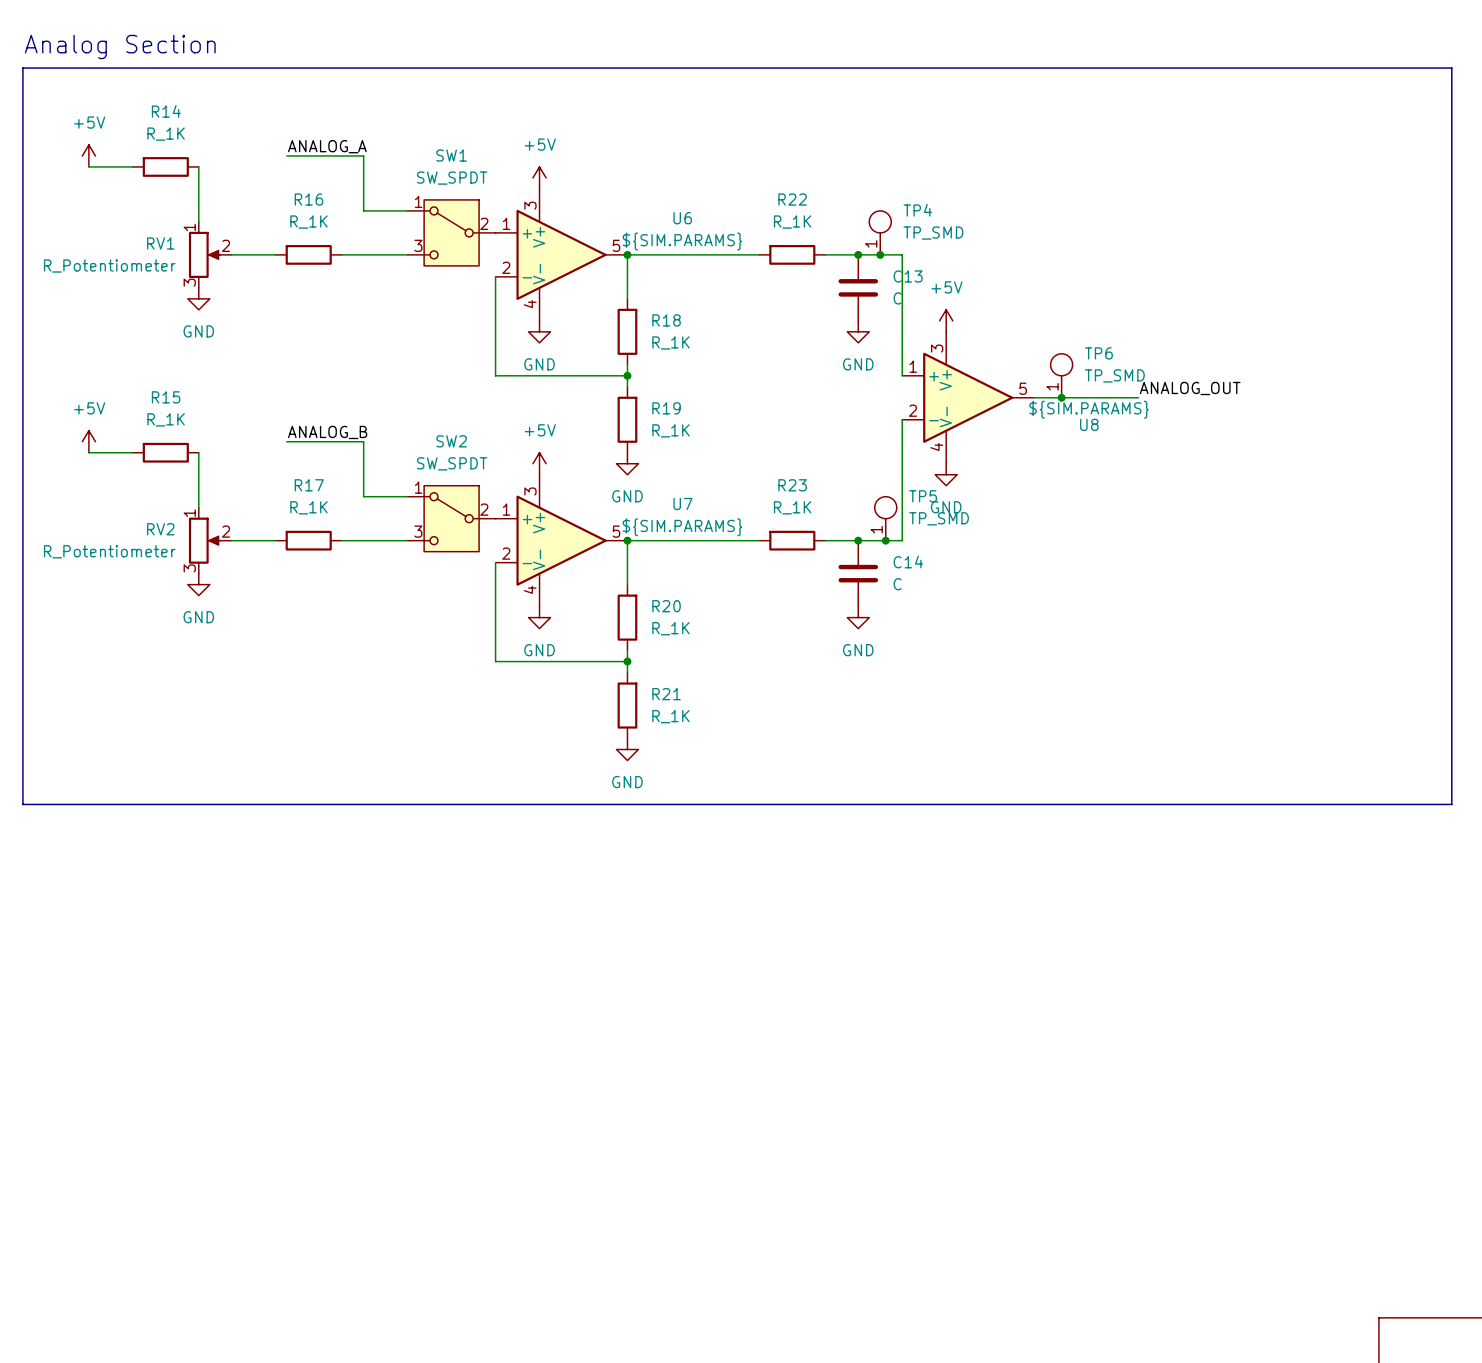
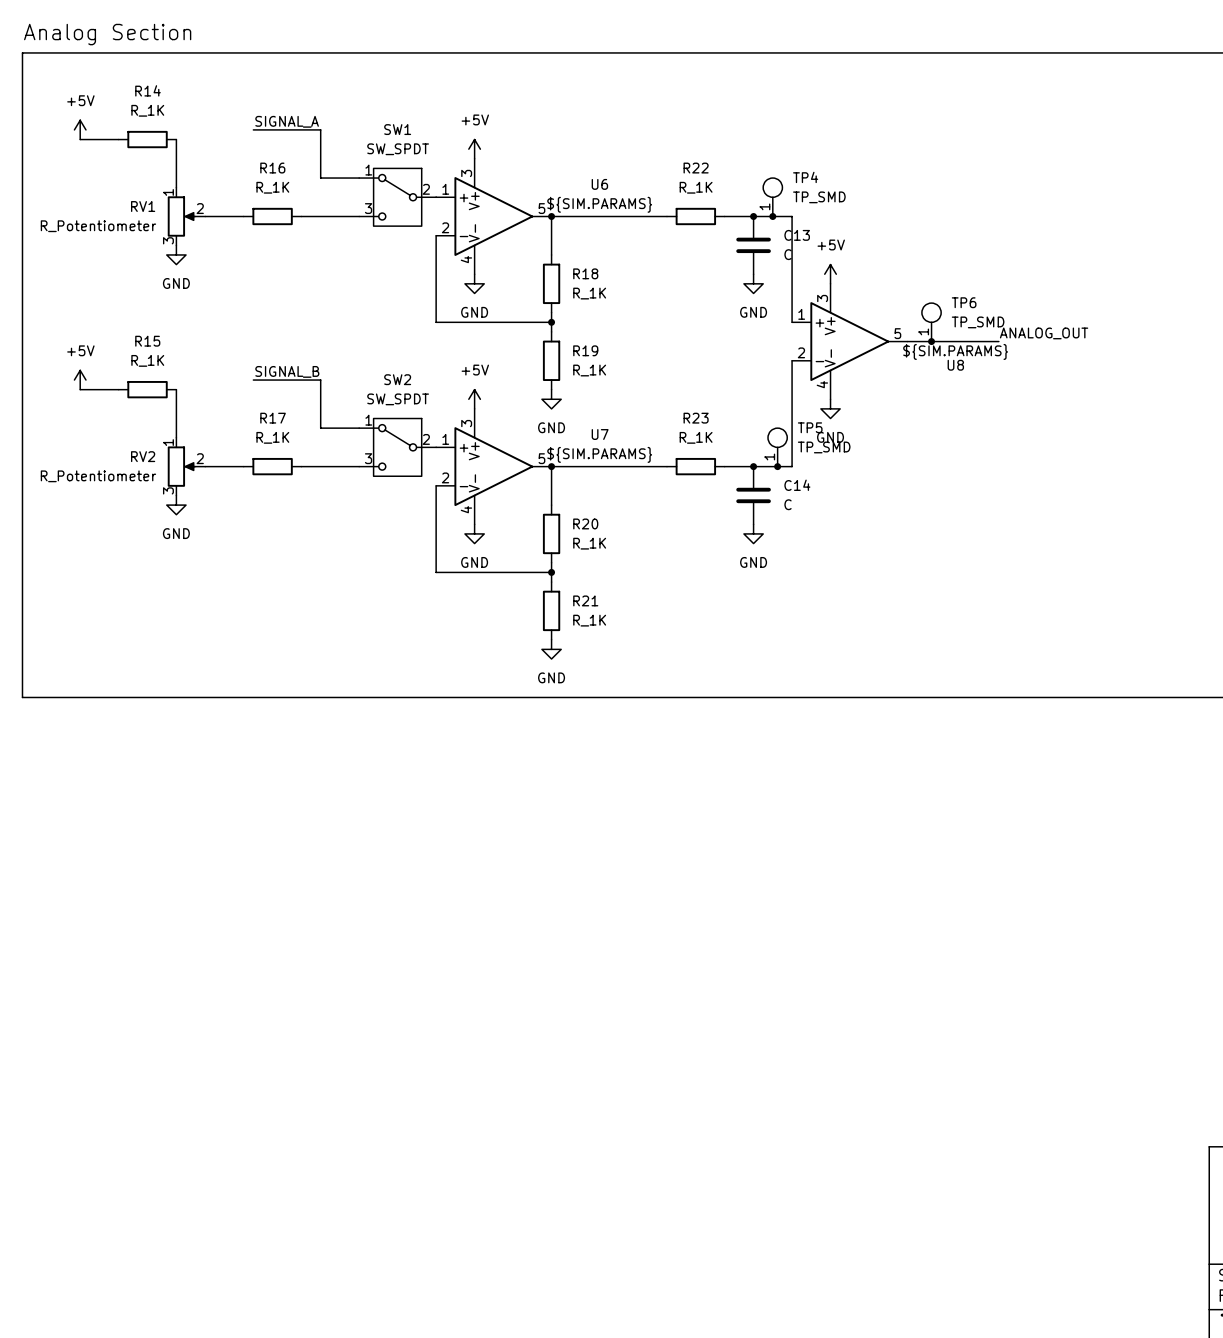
label: ANALOG_A (327, 146) -> SIGNAL_A (287, 121)
label: ANALOG_B (327, 432) -> SIGNAL_B (287, 371)

